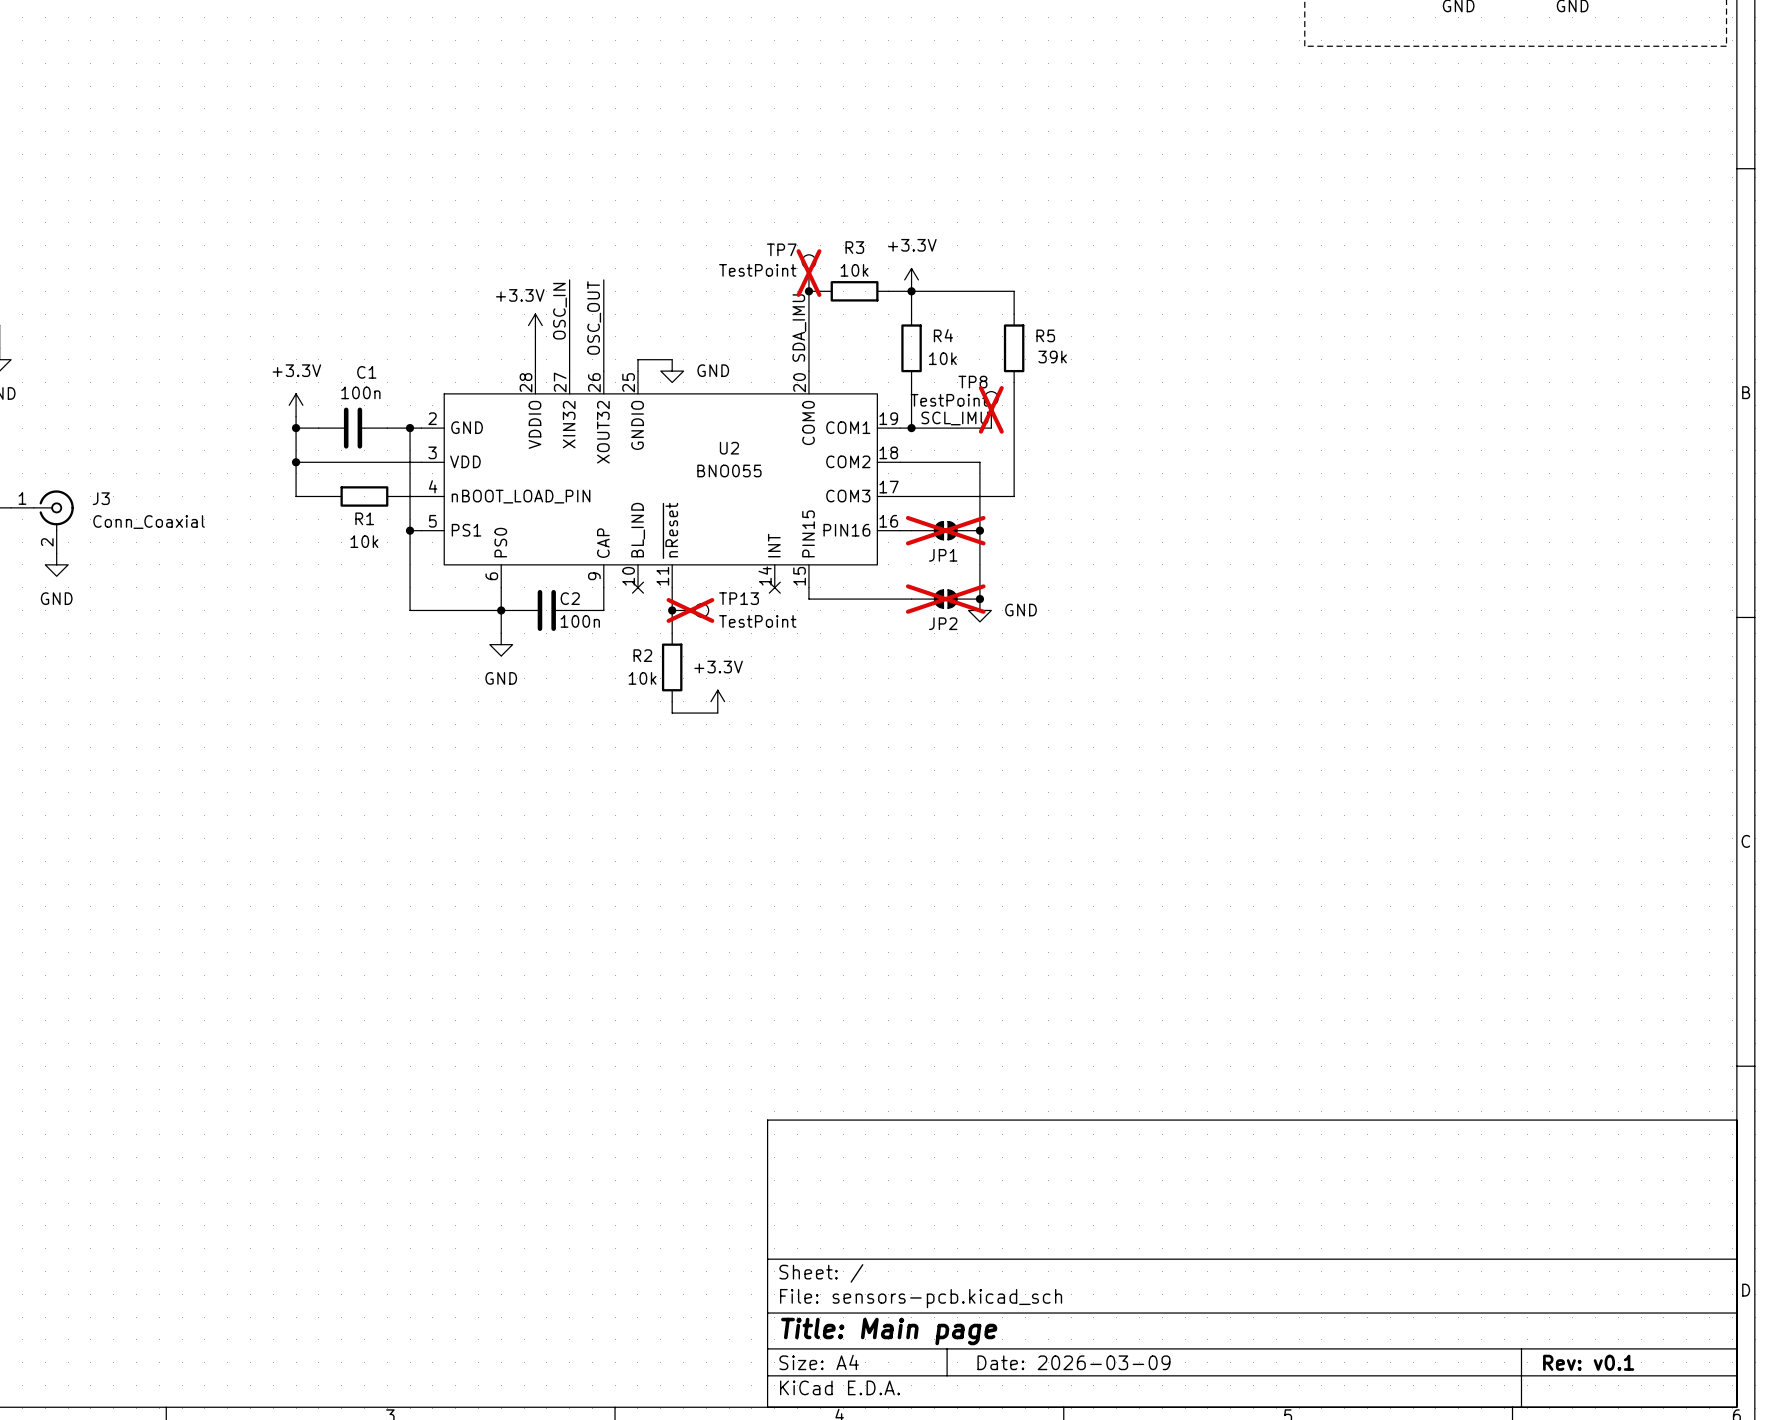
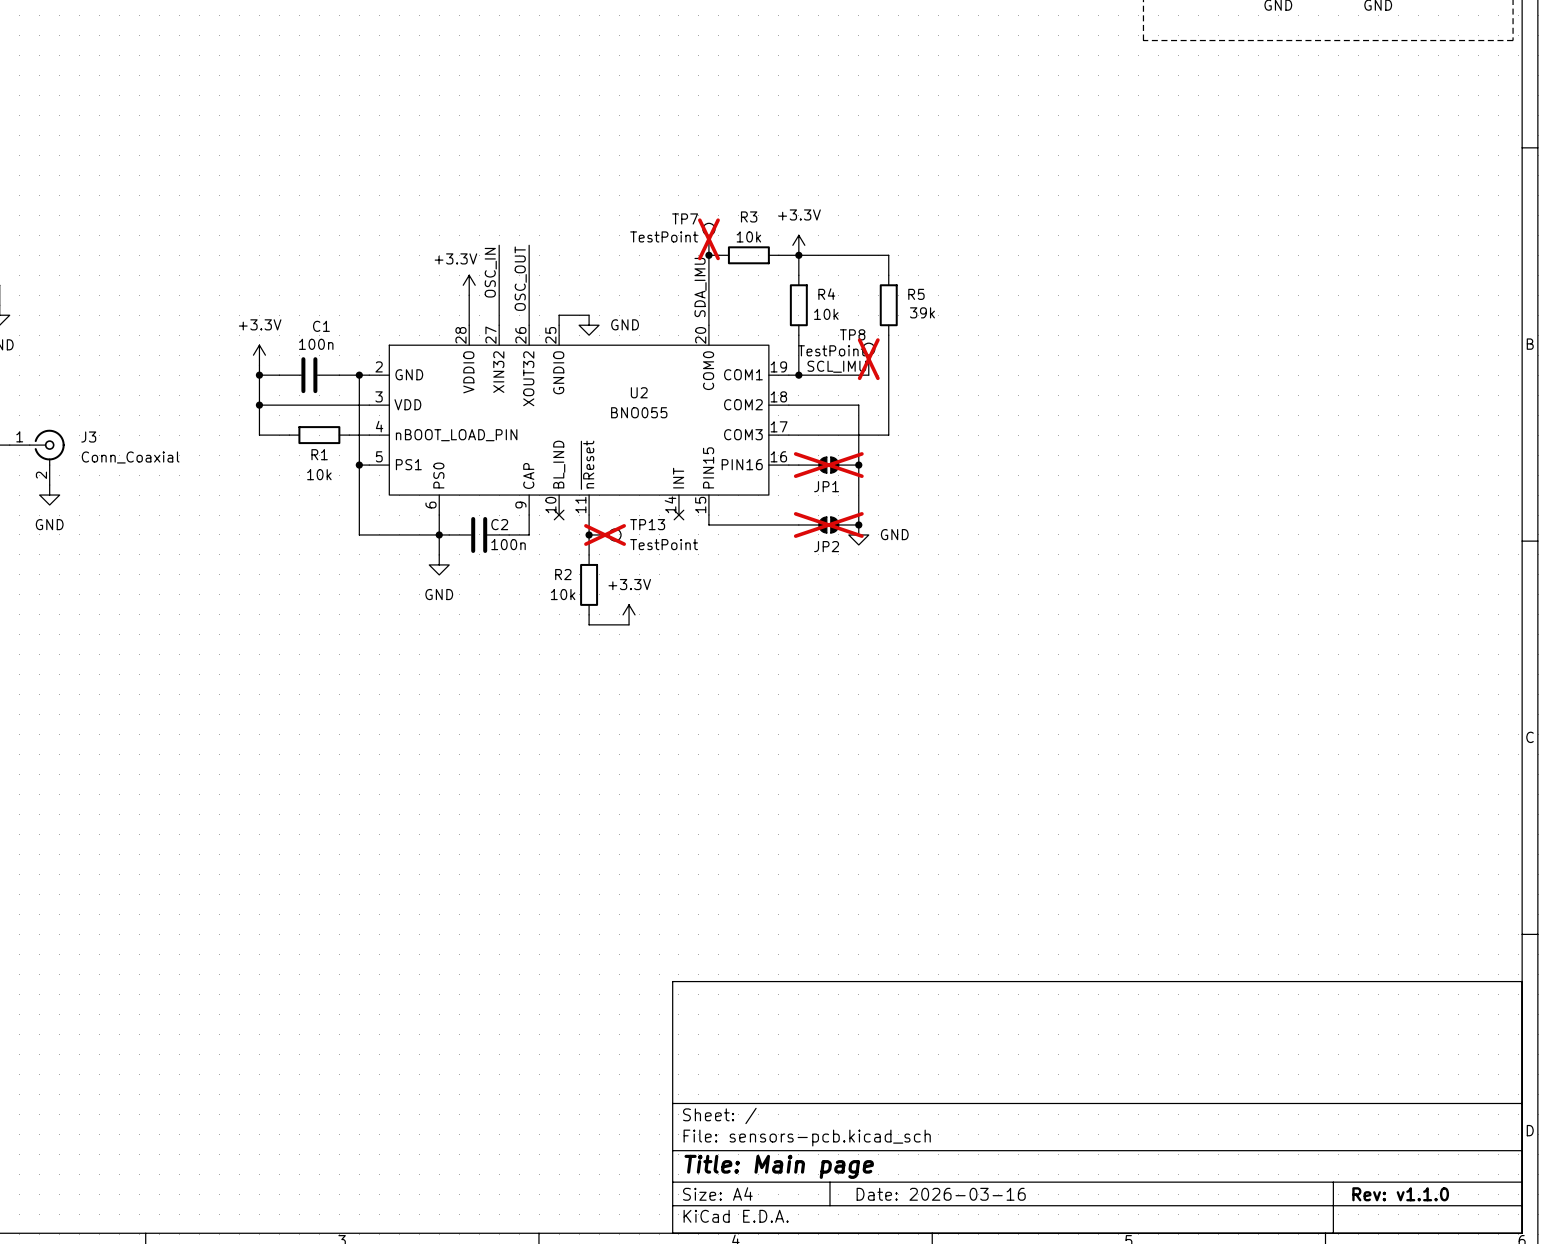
title block: Date: 2026-03-09 (1073, 1362) -> Date: 2026-03-16 (941, 1194)
title block: Rev: v0.1 (1588, 1362) -> Rev: v1.1.0 (1400, 1194)

